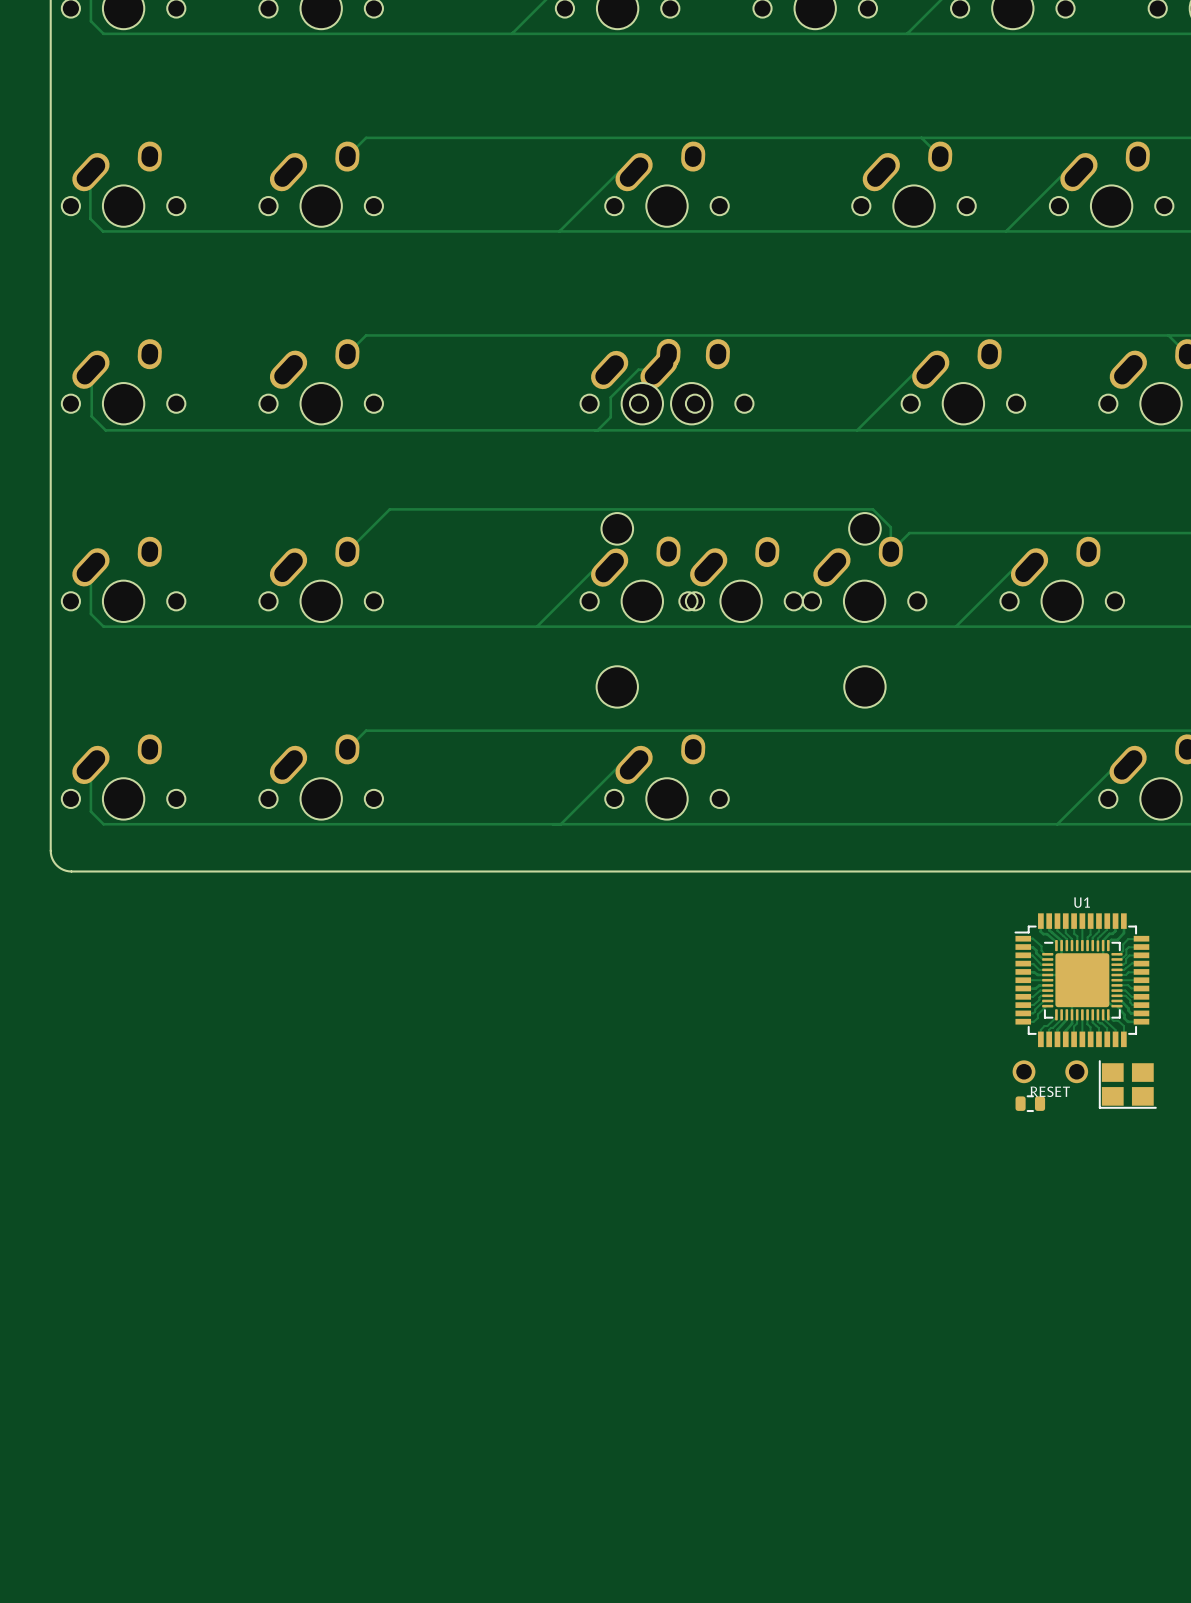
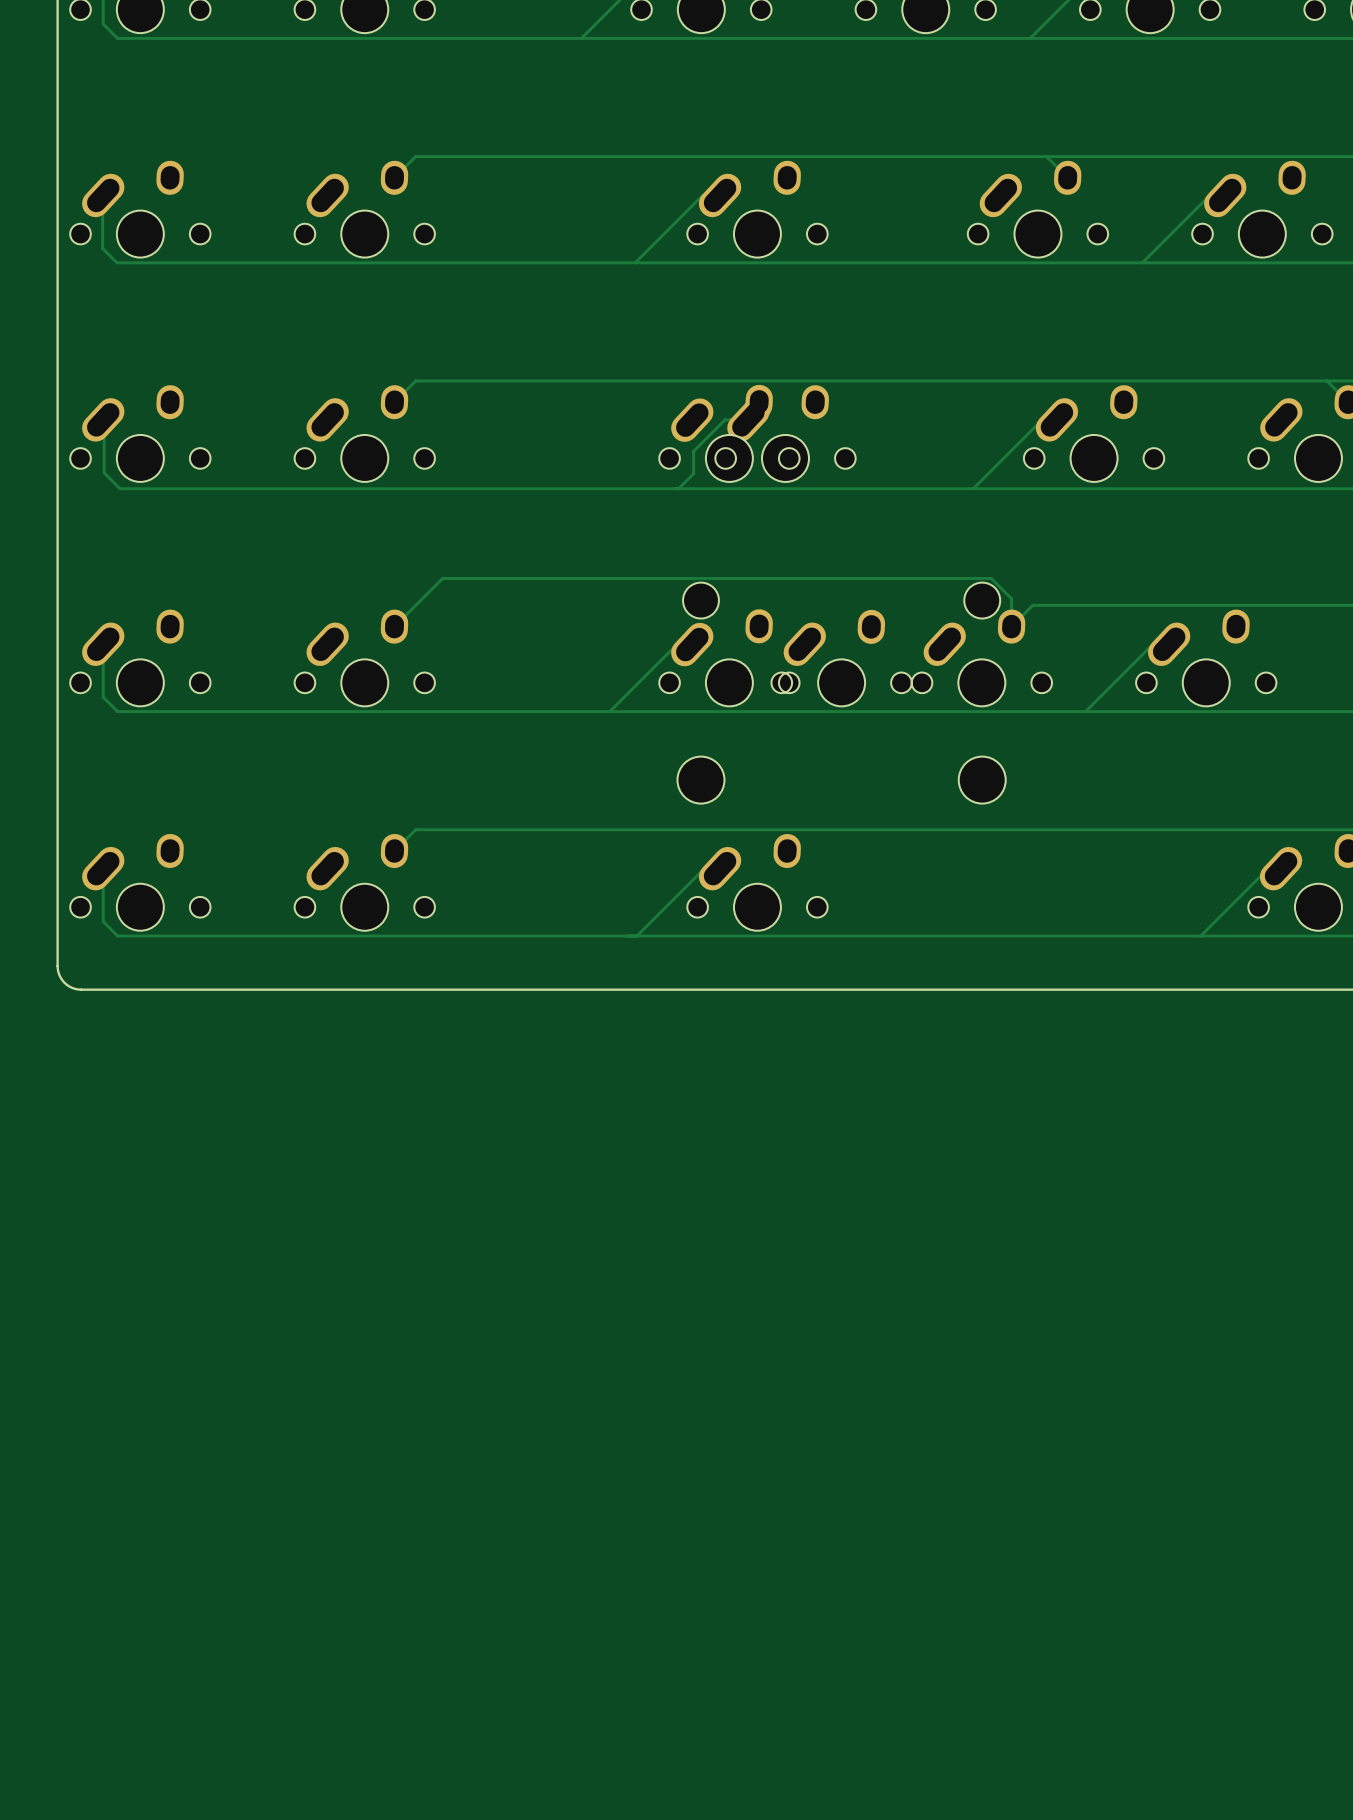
U1: (1081, 980) -> none
part: (1050, 1071) -> none
part: (1127, 1084) -> none
part: (1030, 1103) -> none

